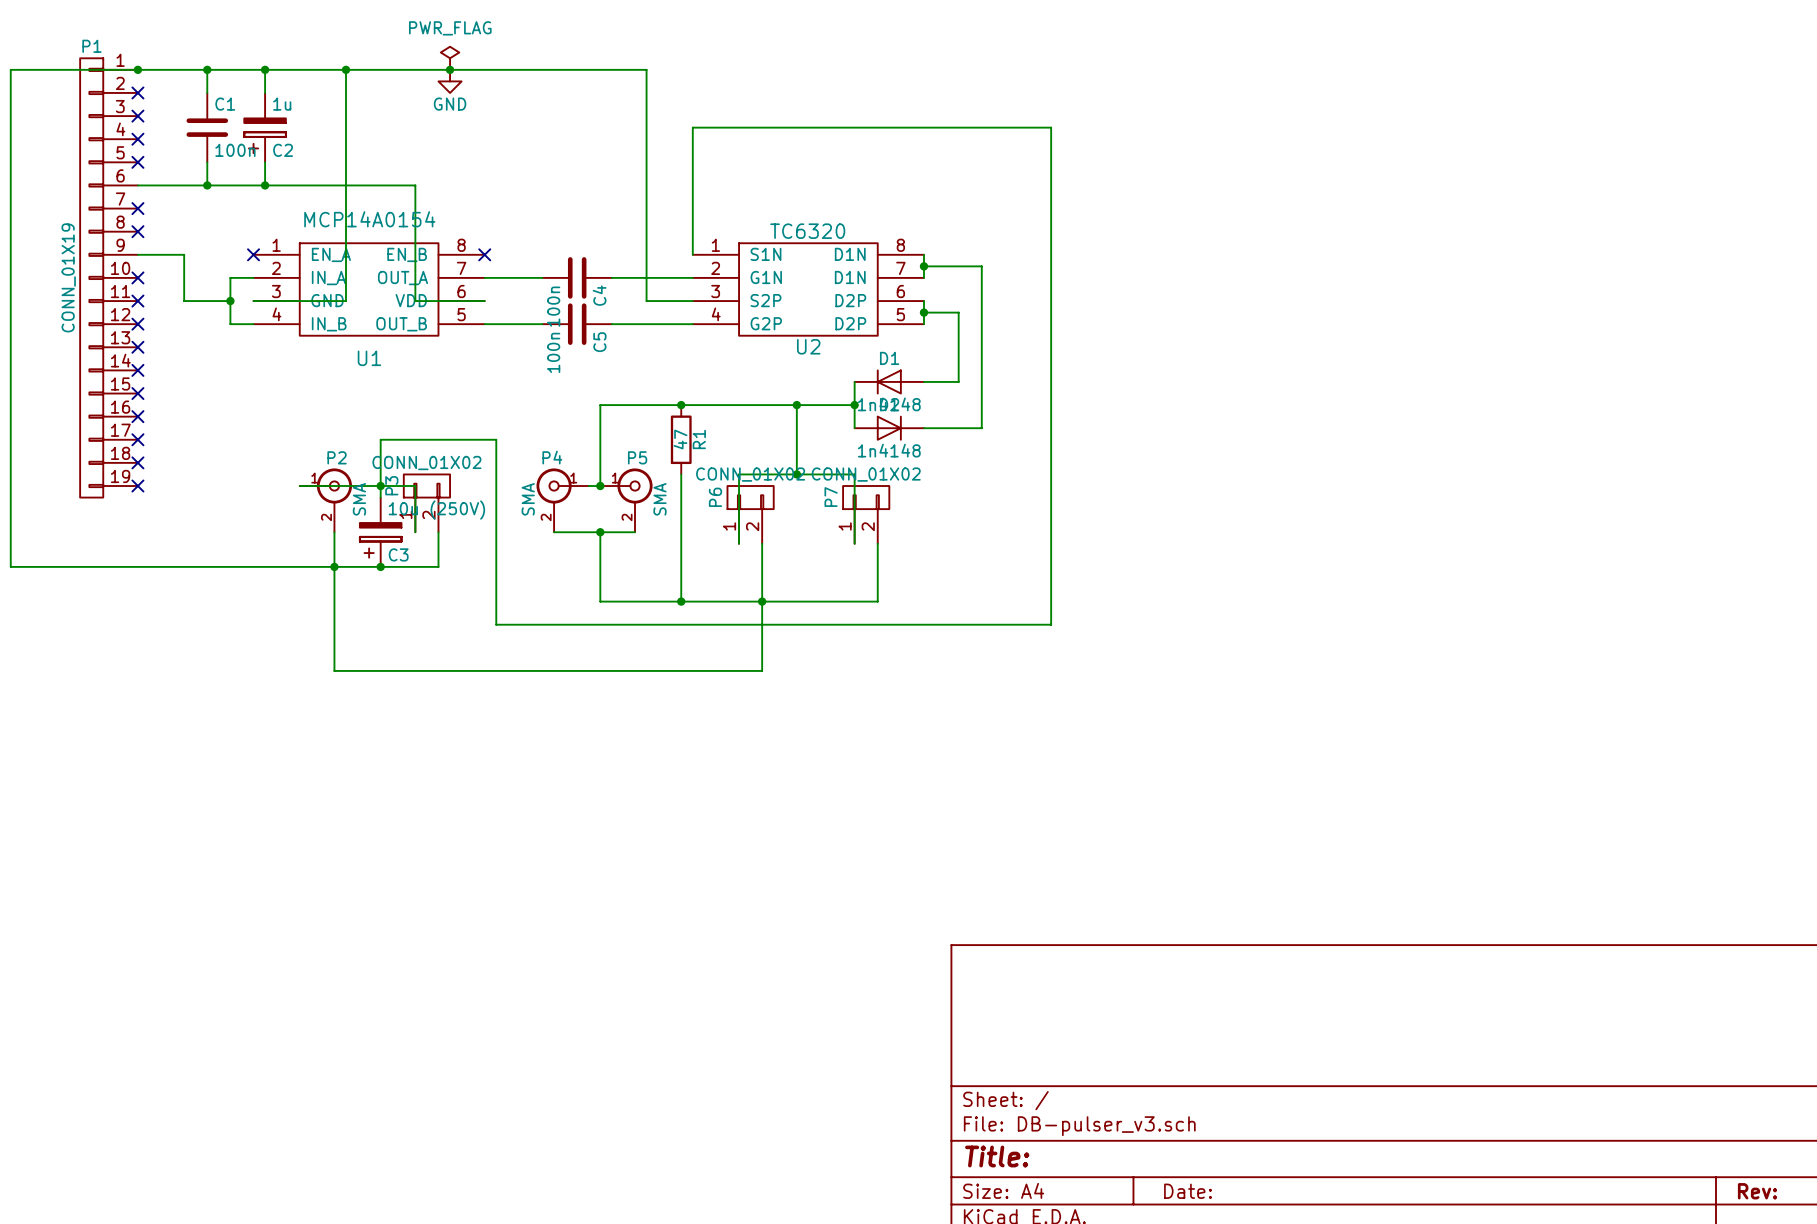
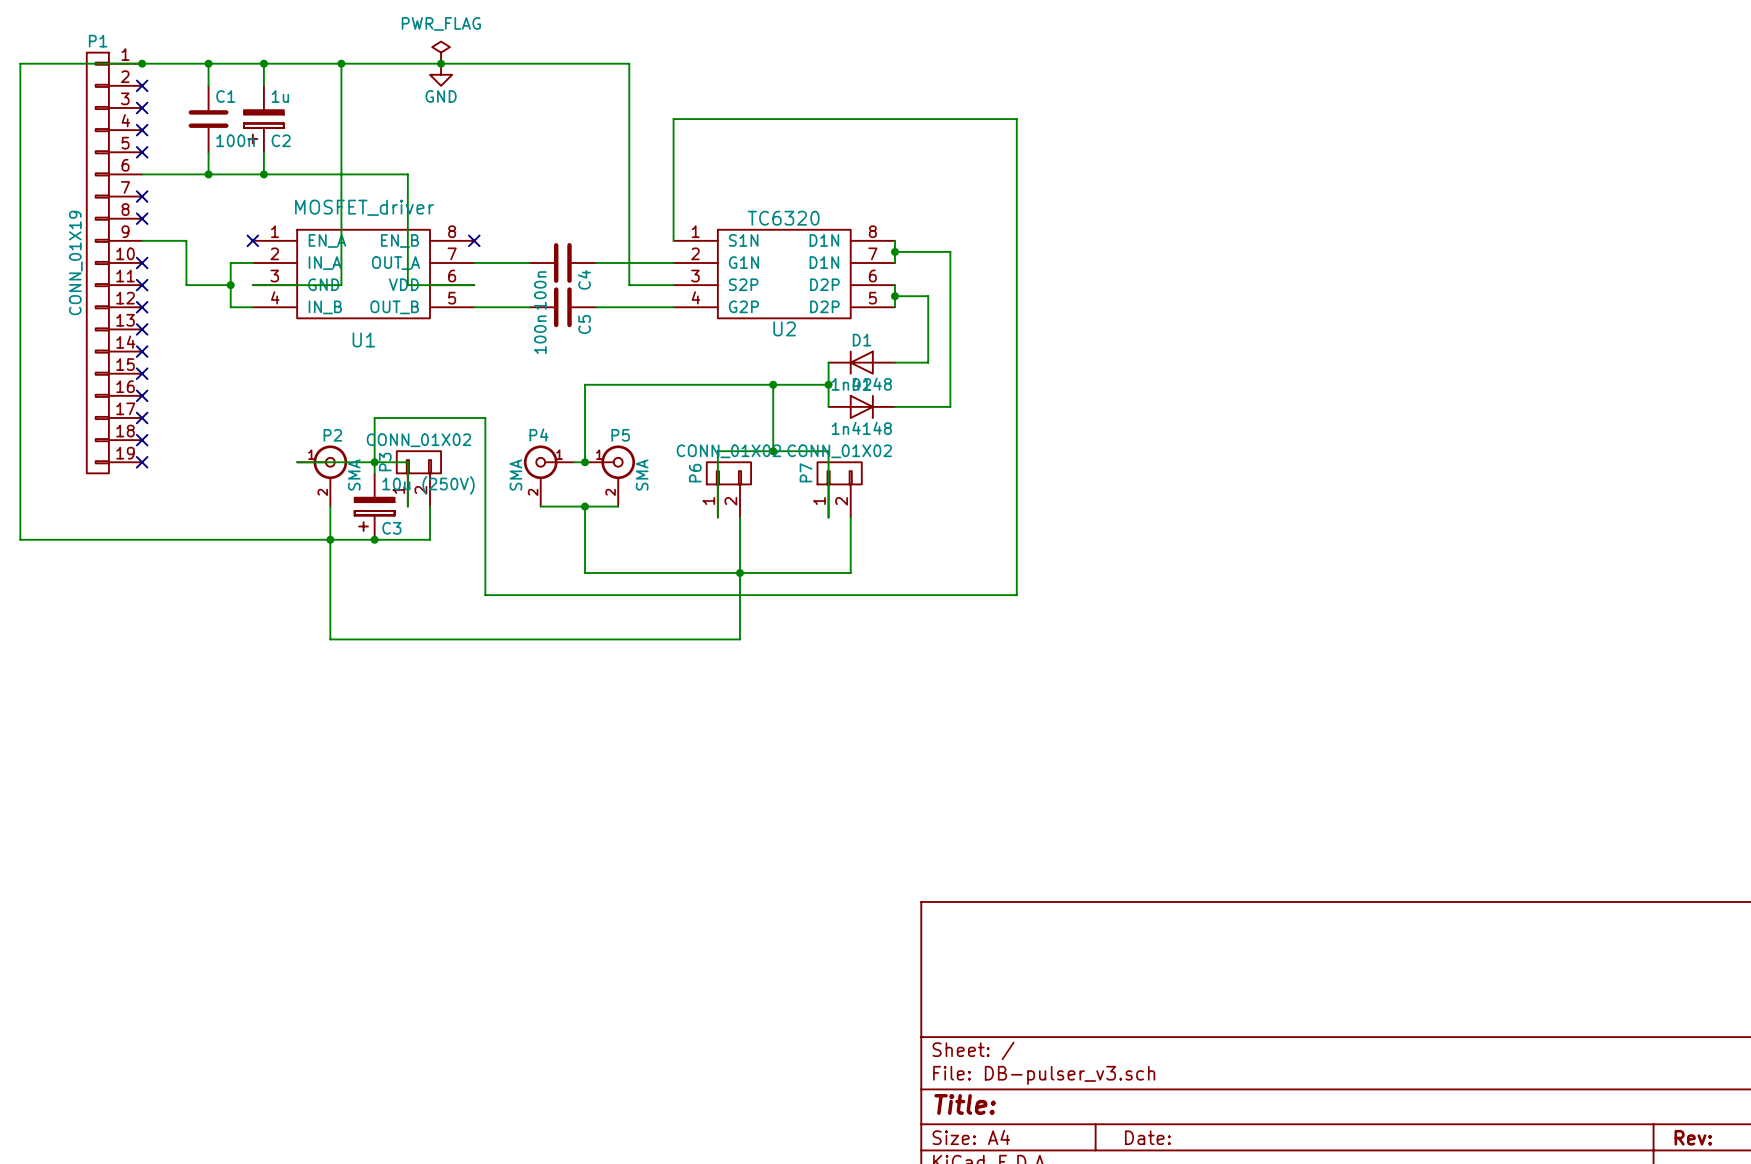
U1 value: MCP14A0154 (369, 219) -> MOSFET_driver (364, 207)
junction: (681, 405) -> none
R1: 47 (681, 439) -> none
wire: (681, 474) (681, 601) -> none
junction: (681, 601) -> none

